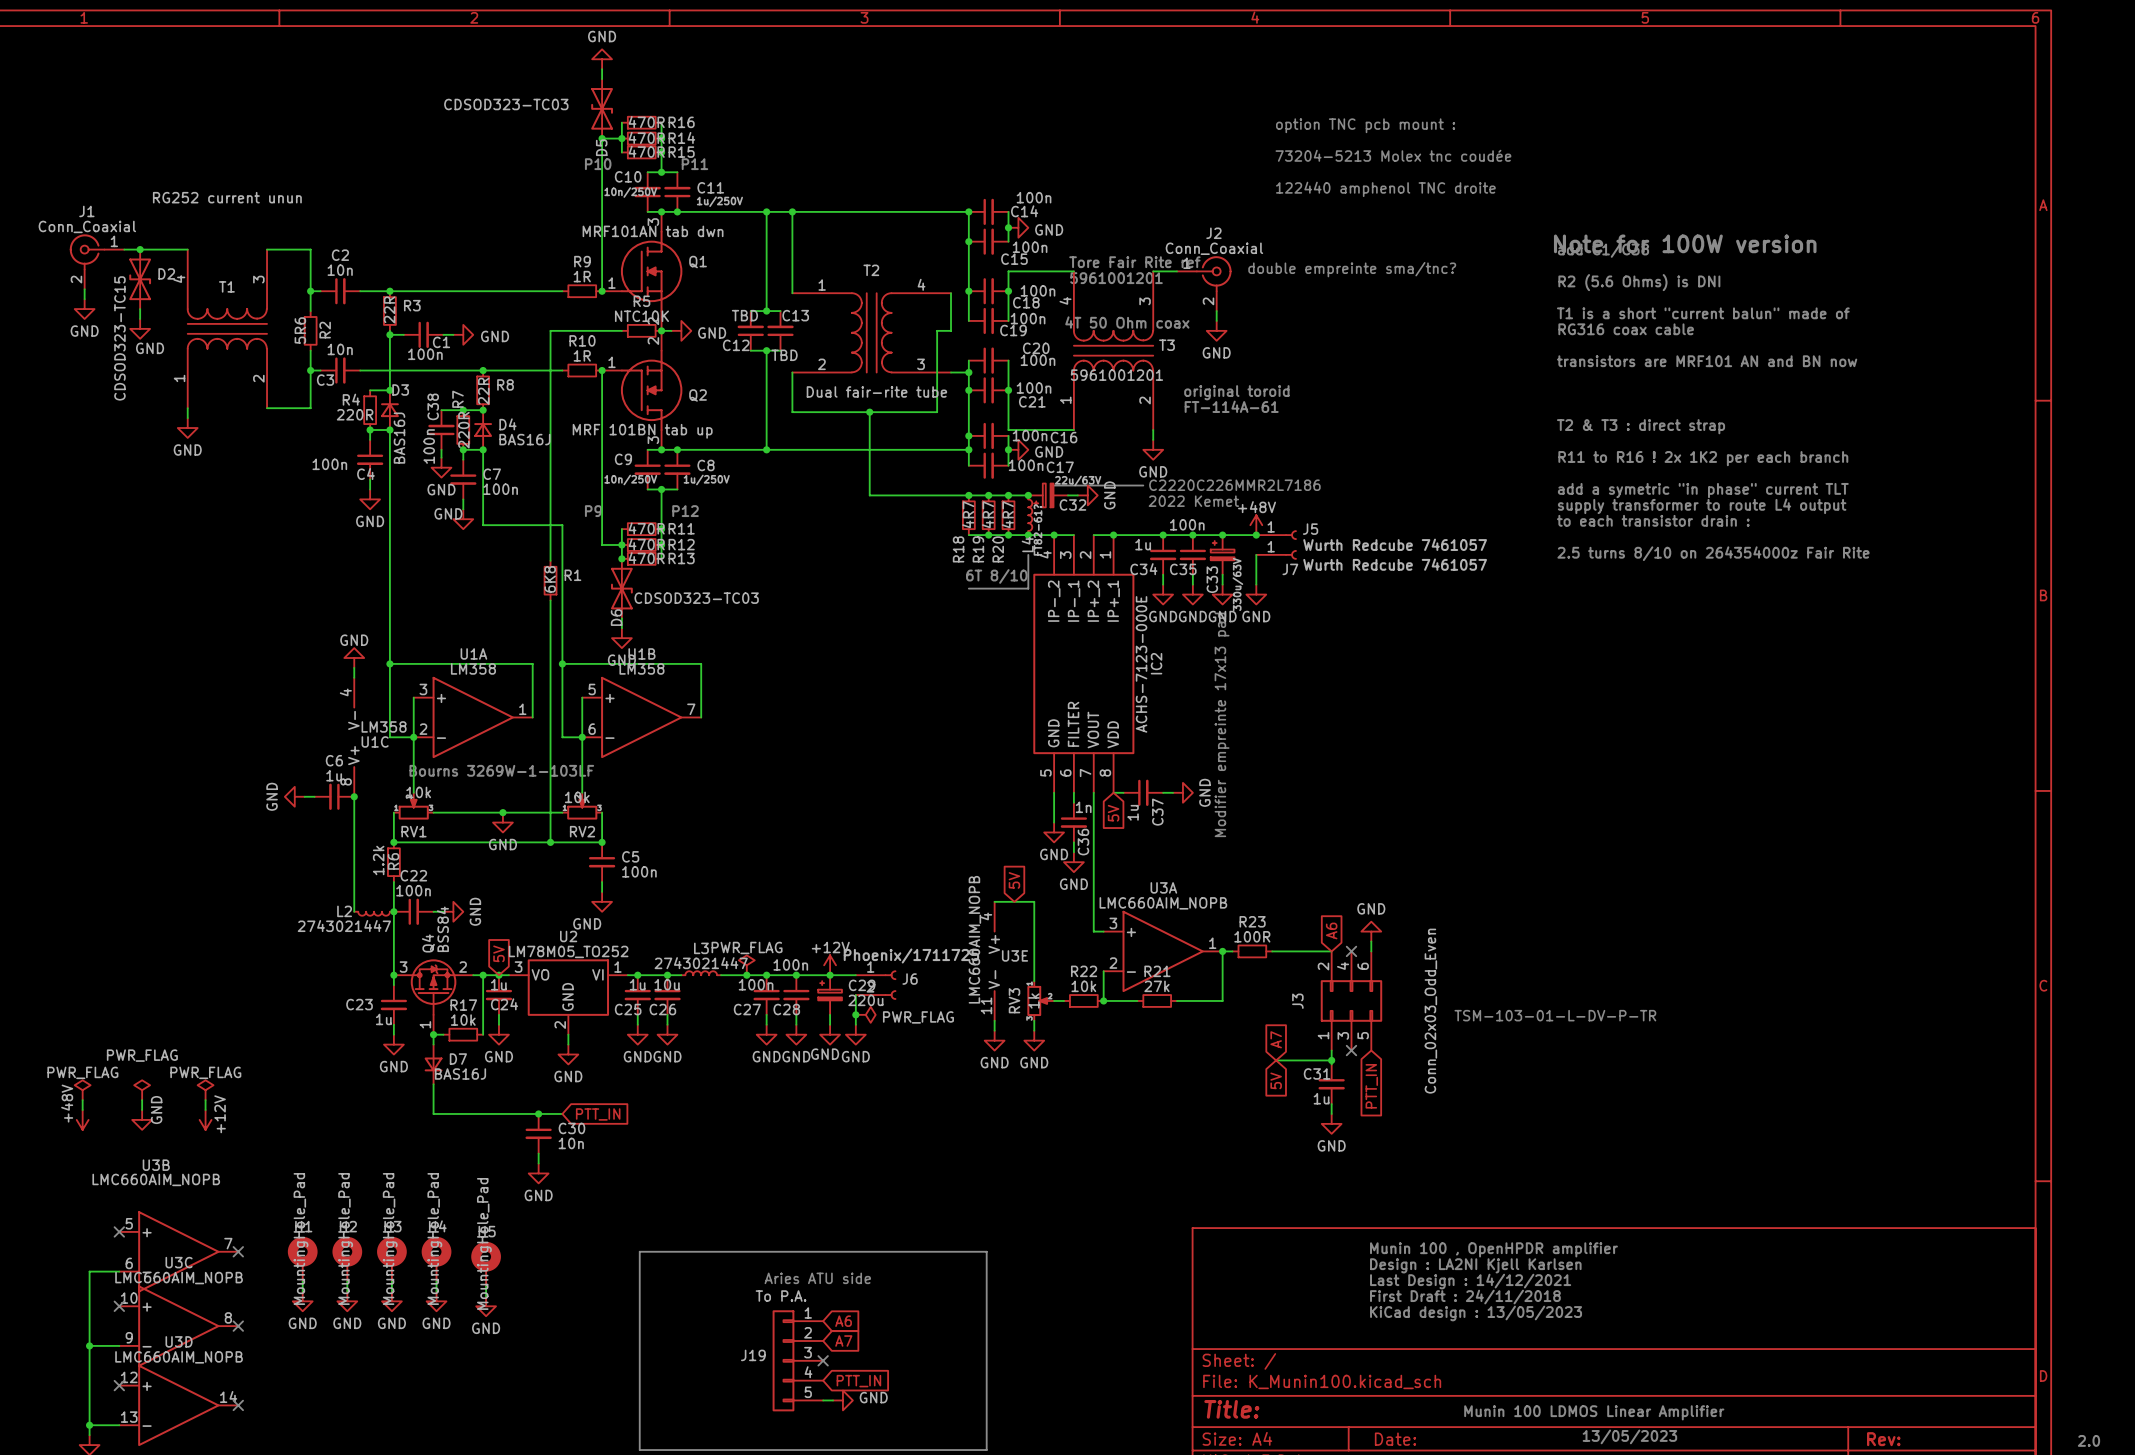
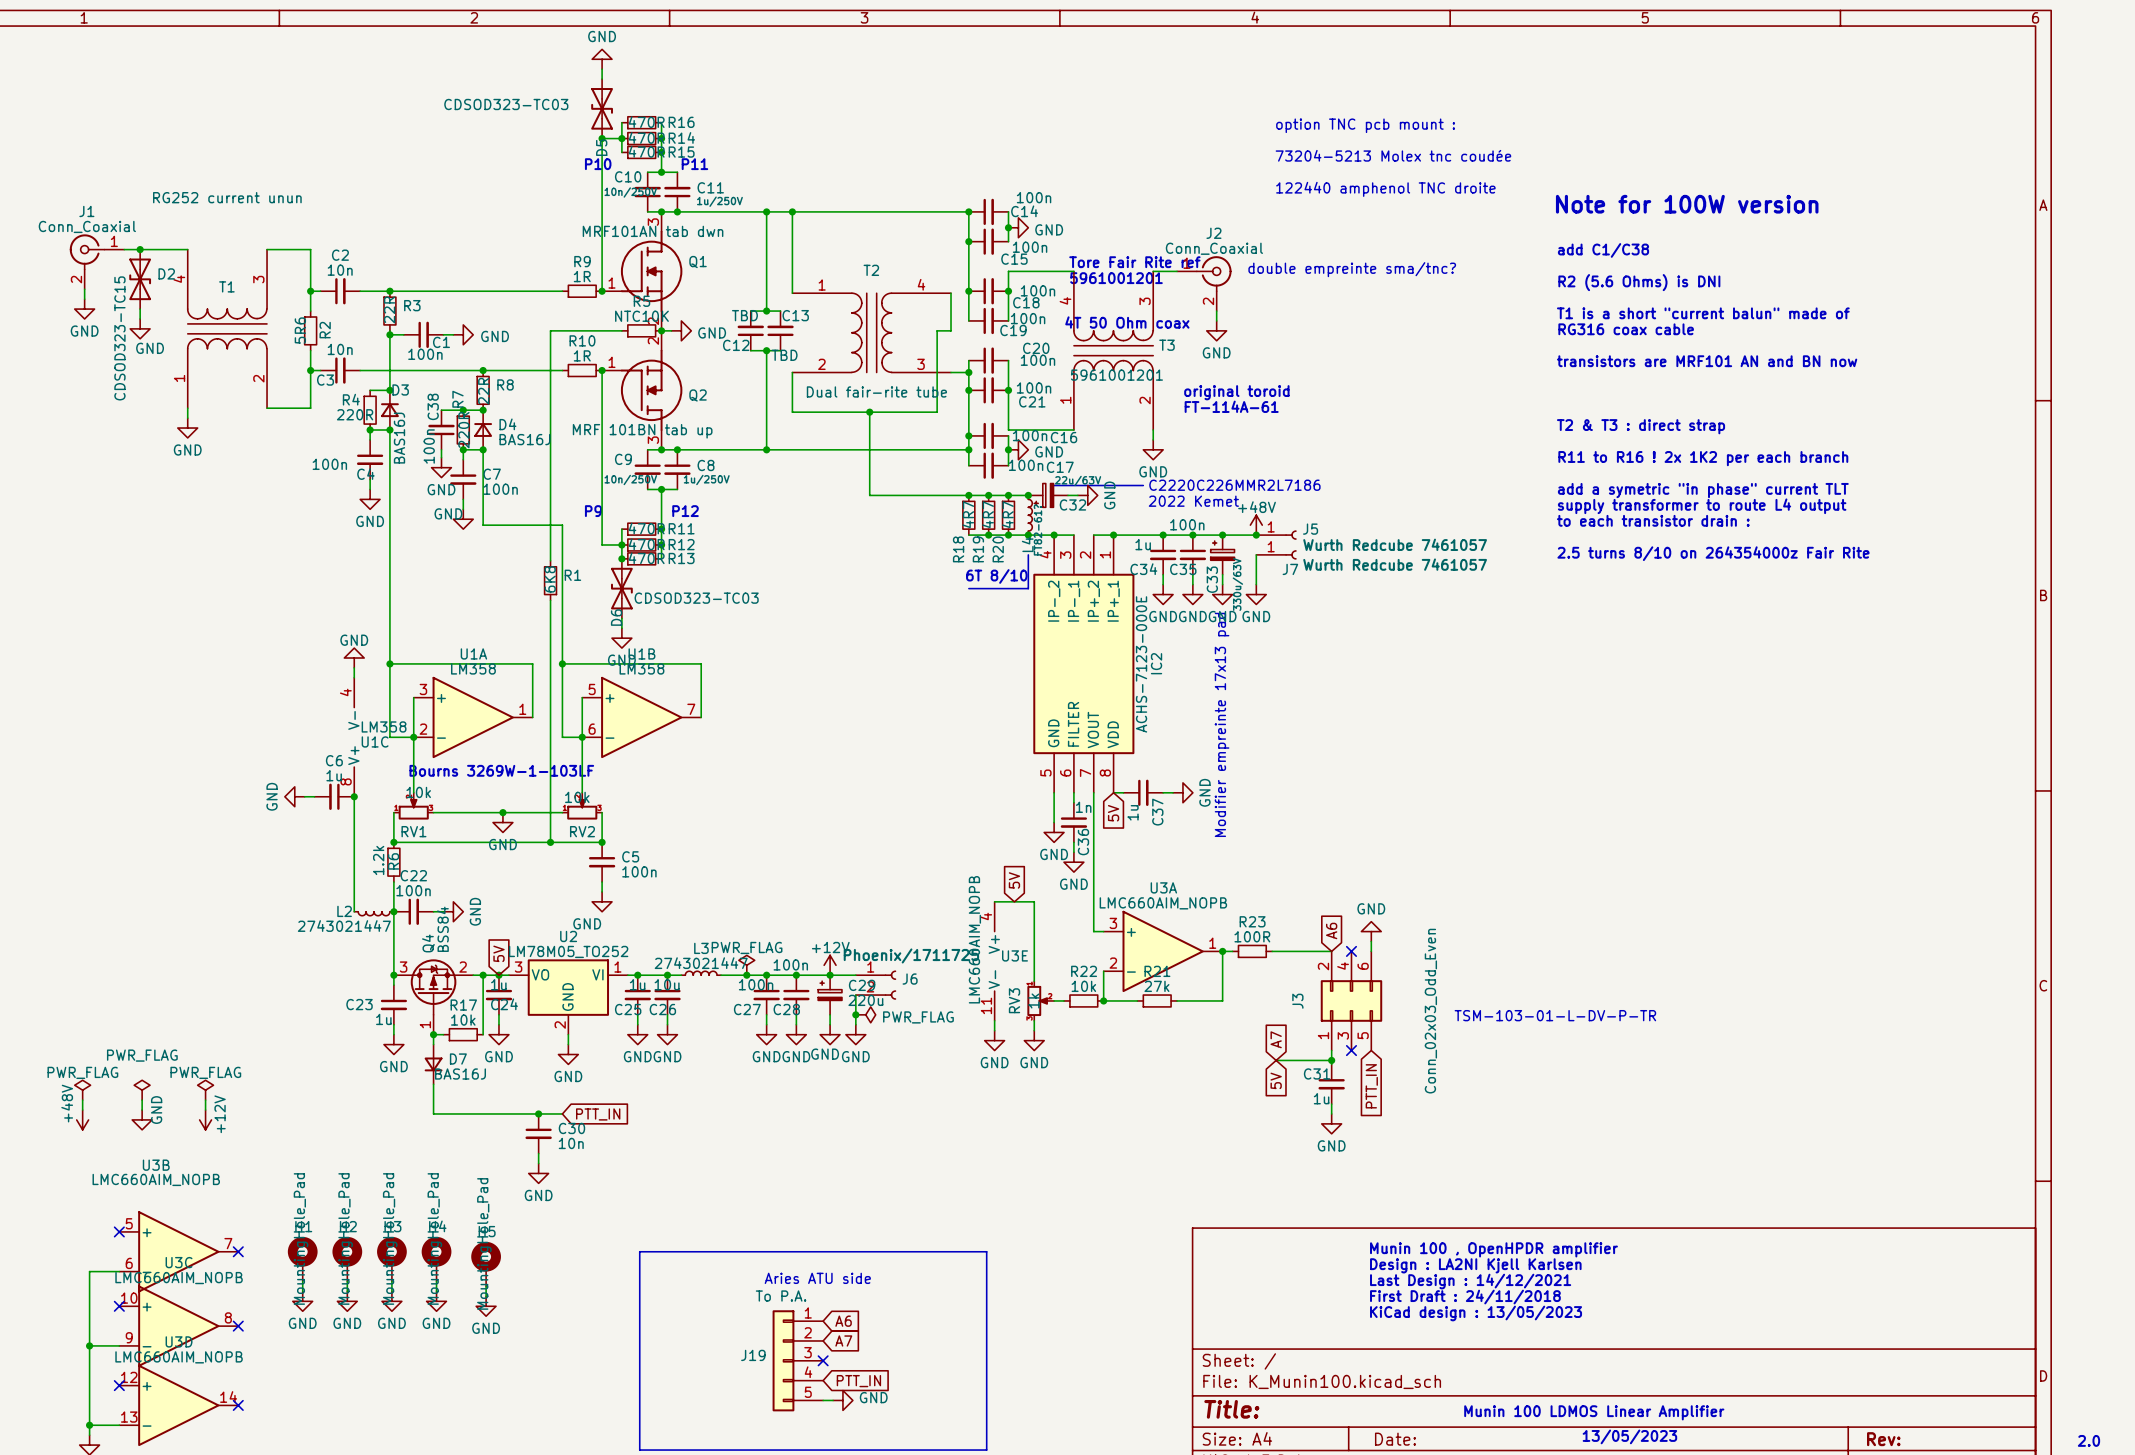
text position: Note for 100W version (1685, 243) -> Note for 100W version (1687, 204)

